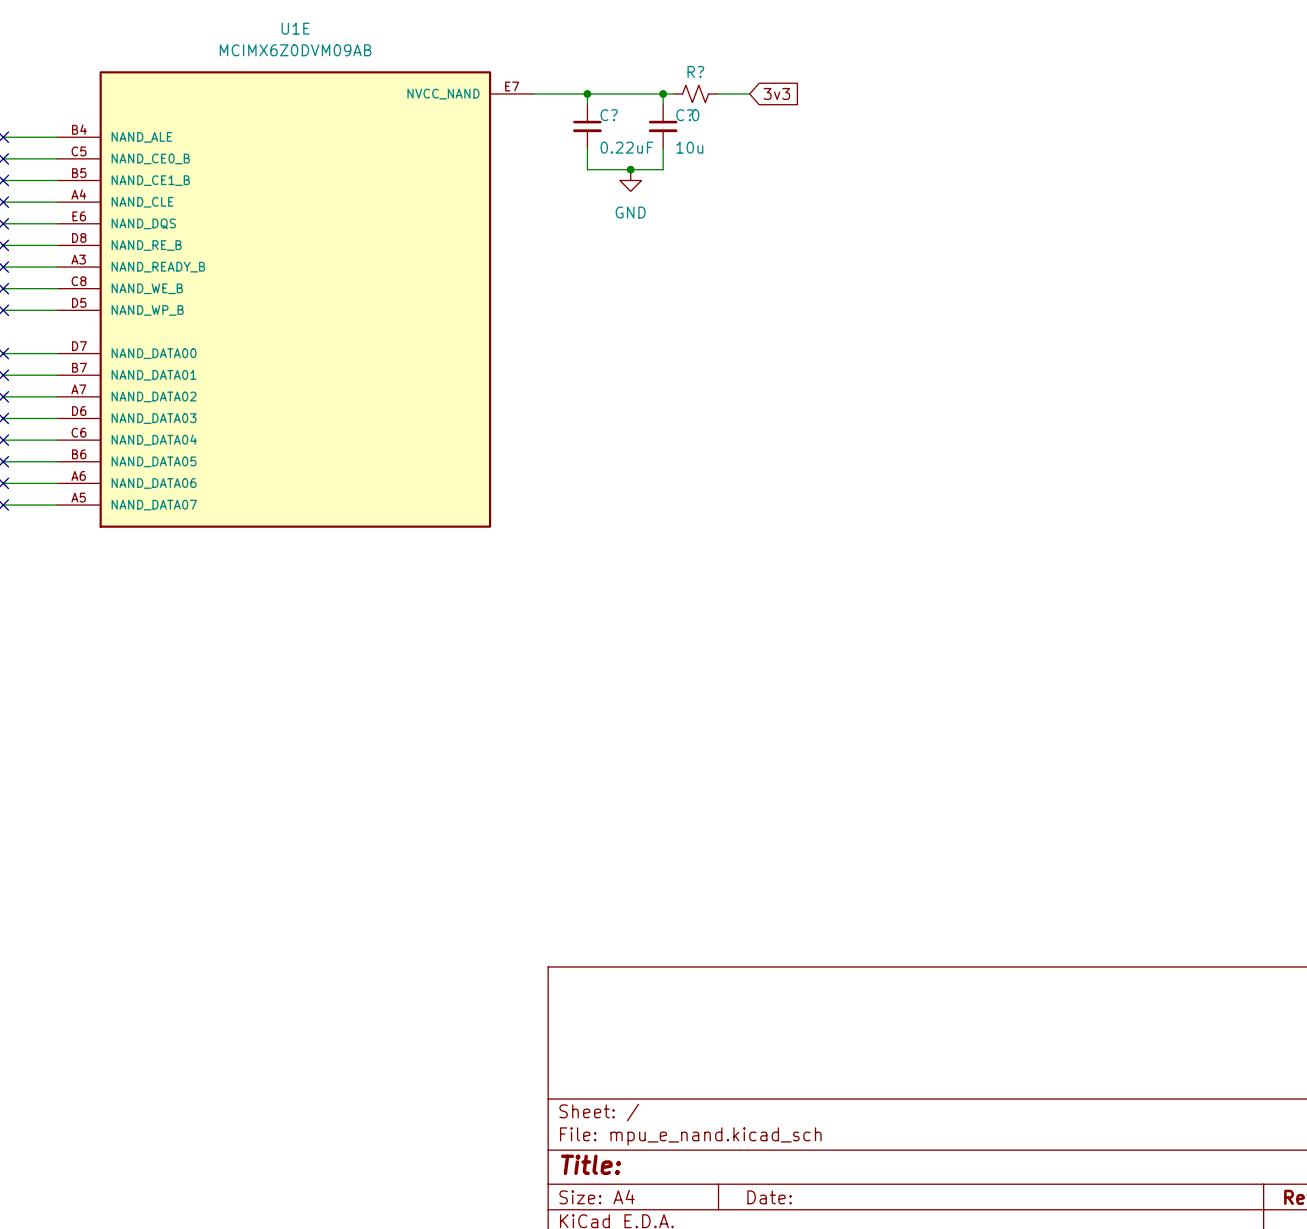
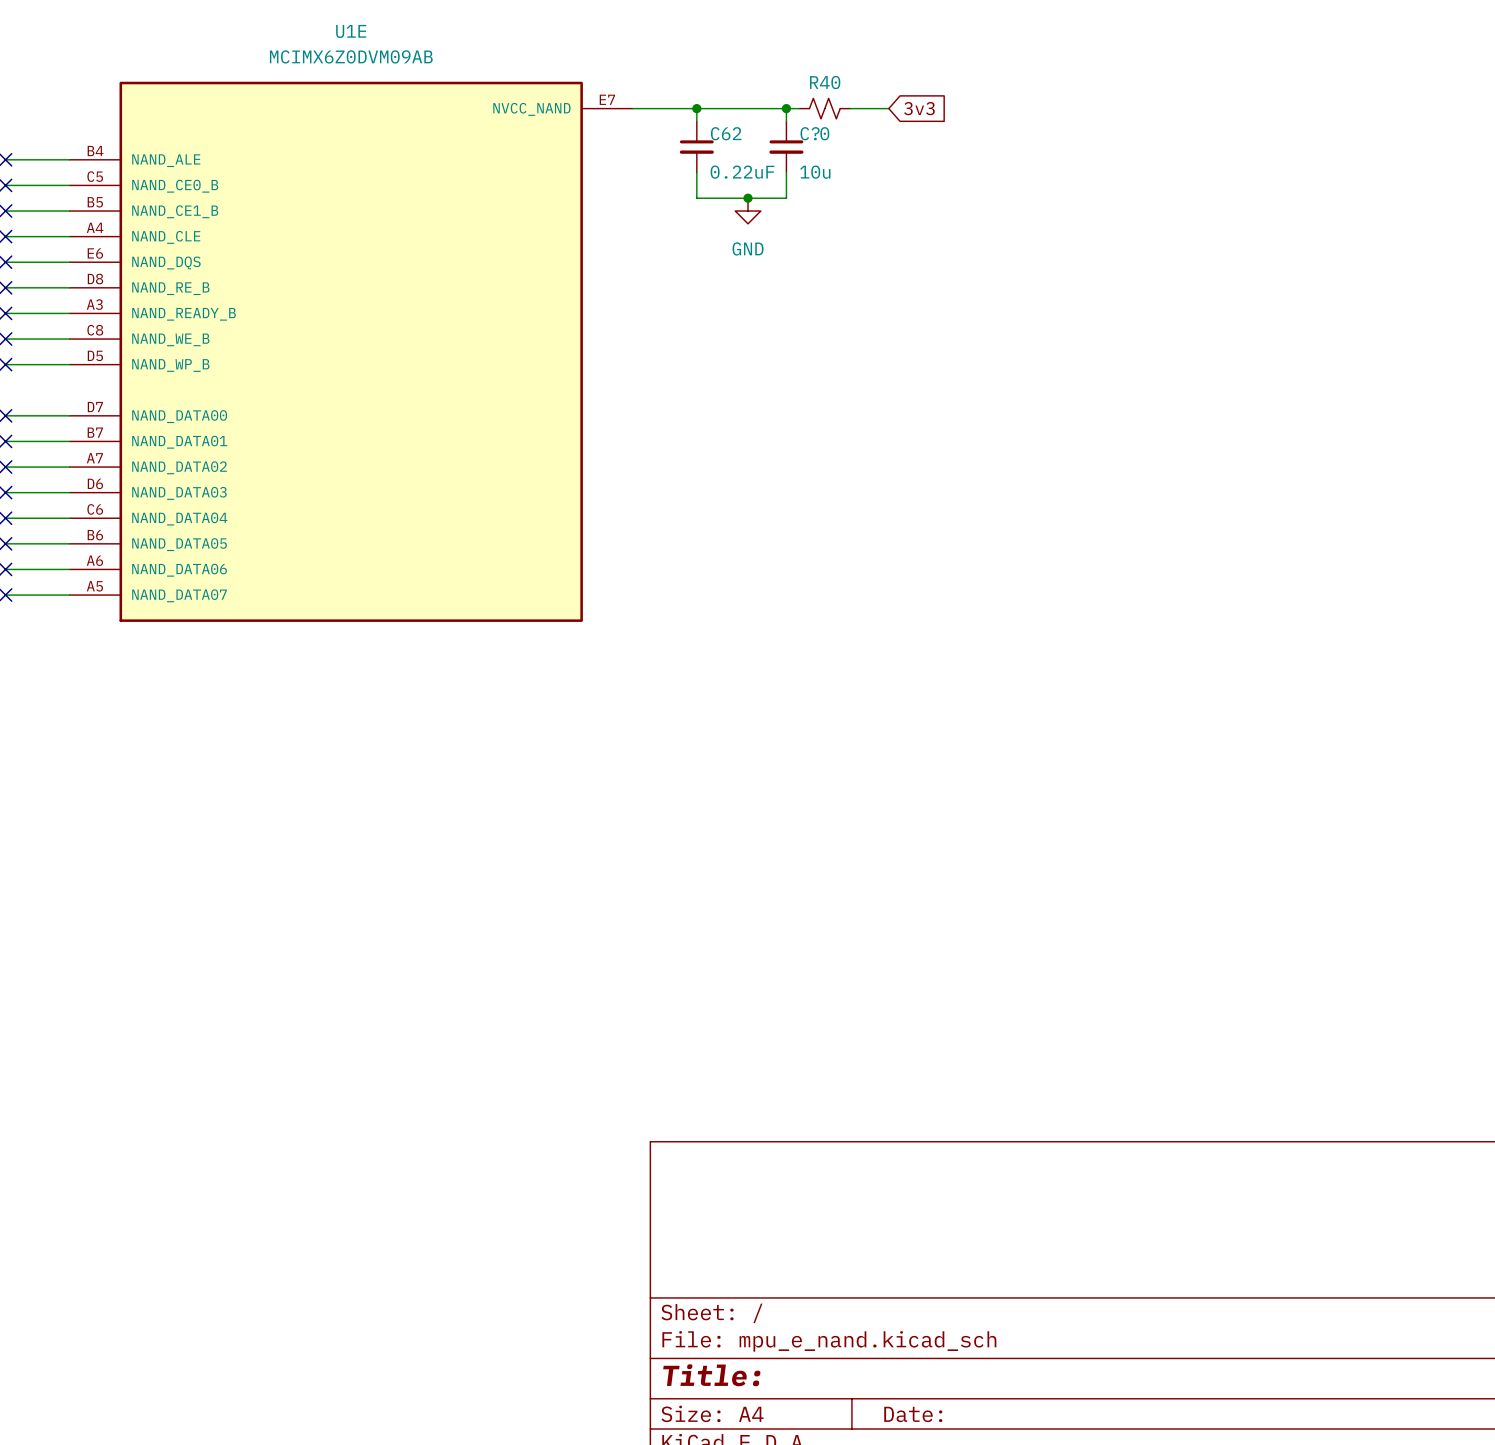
R? name: R? (695, 71) -> R40 (825, 82)
C? name: C? (609, 115) -> C62 (726, 133)

